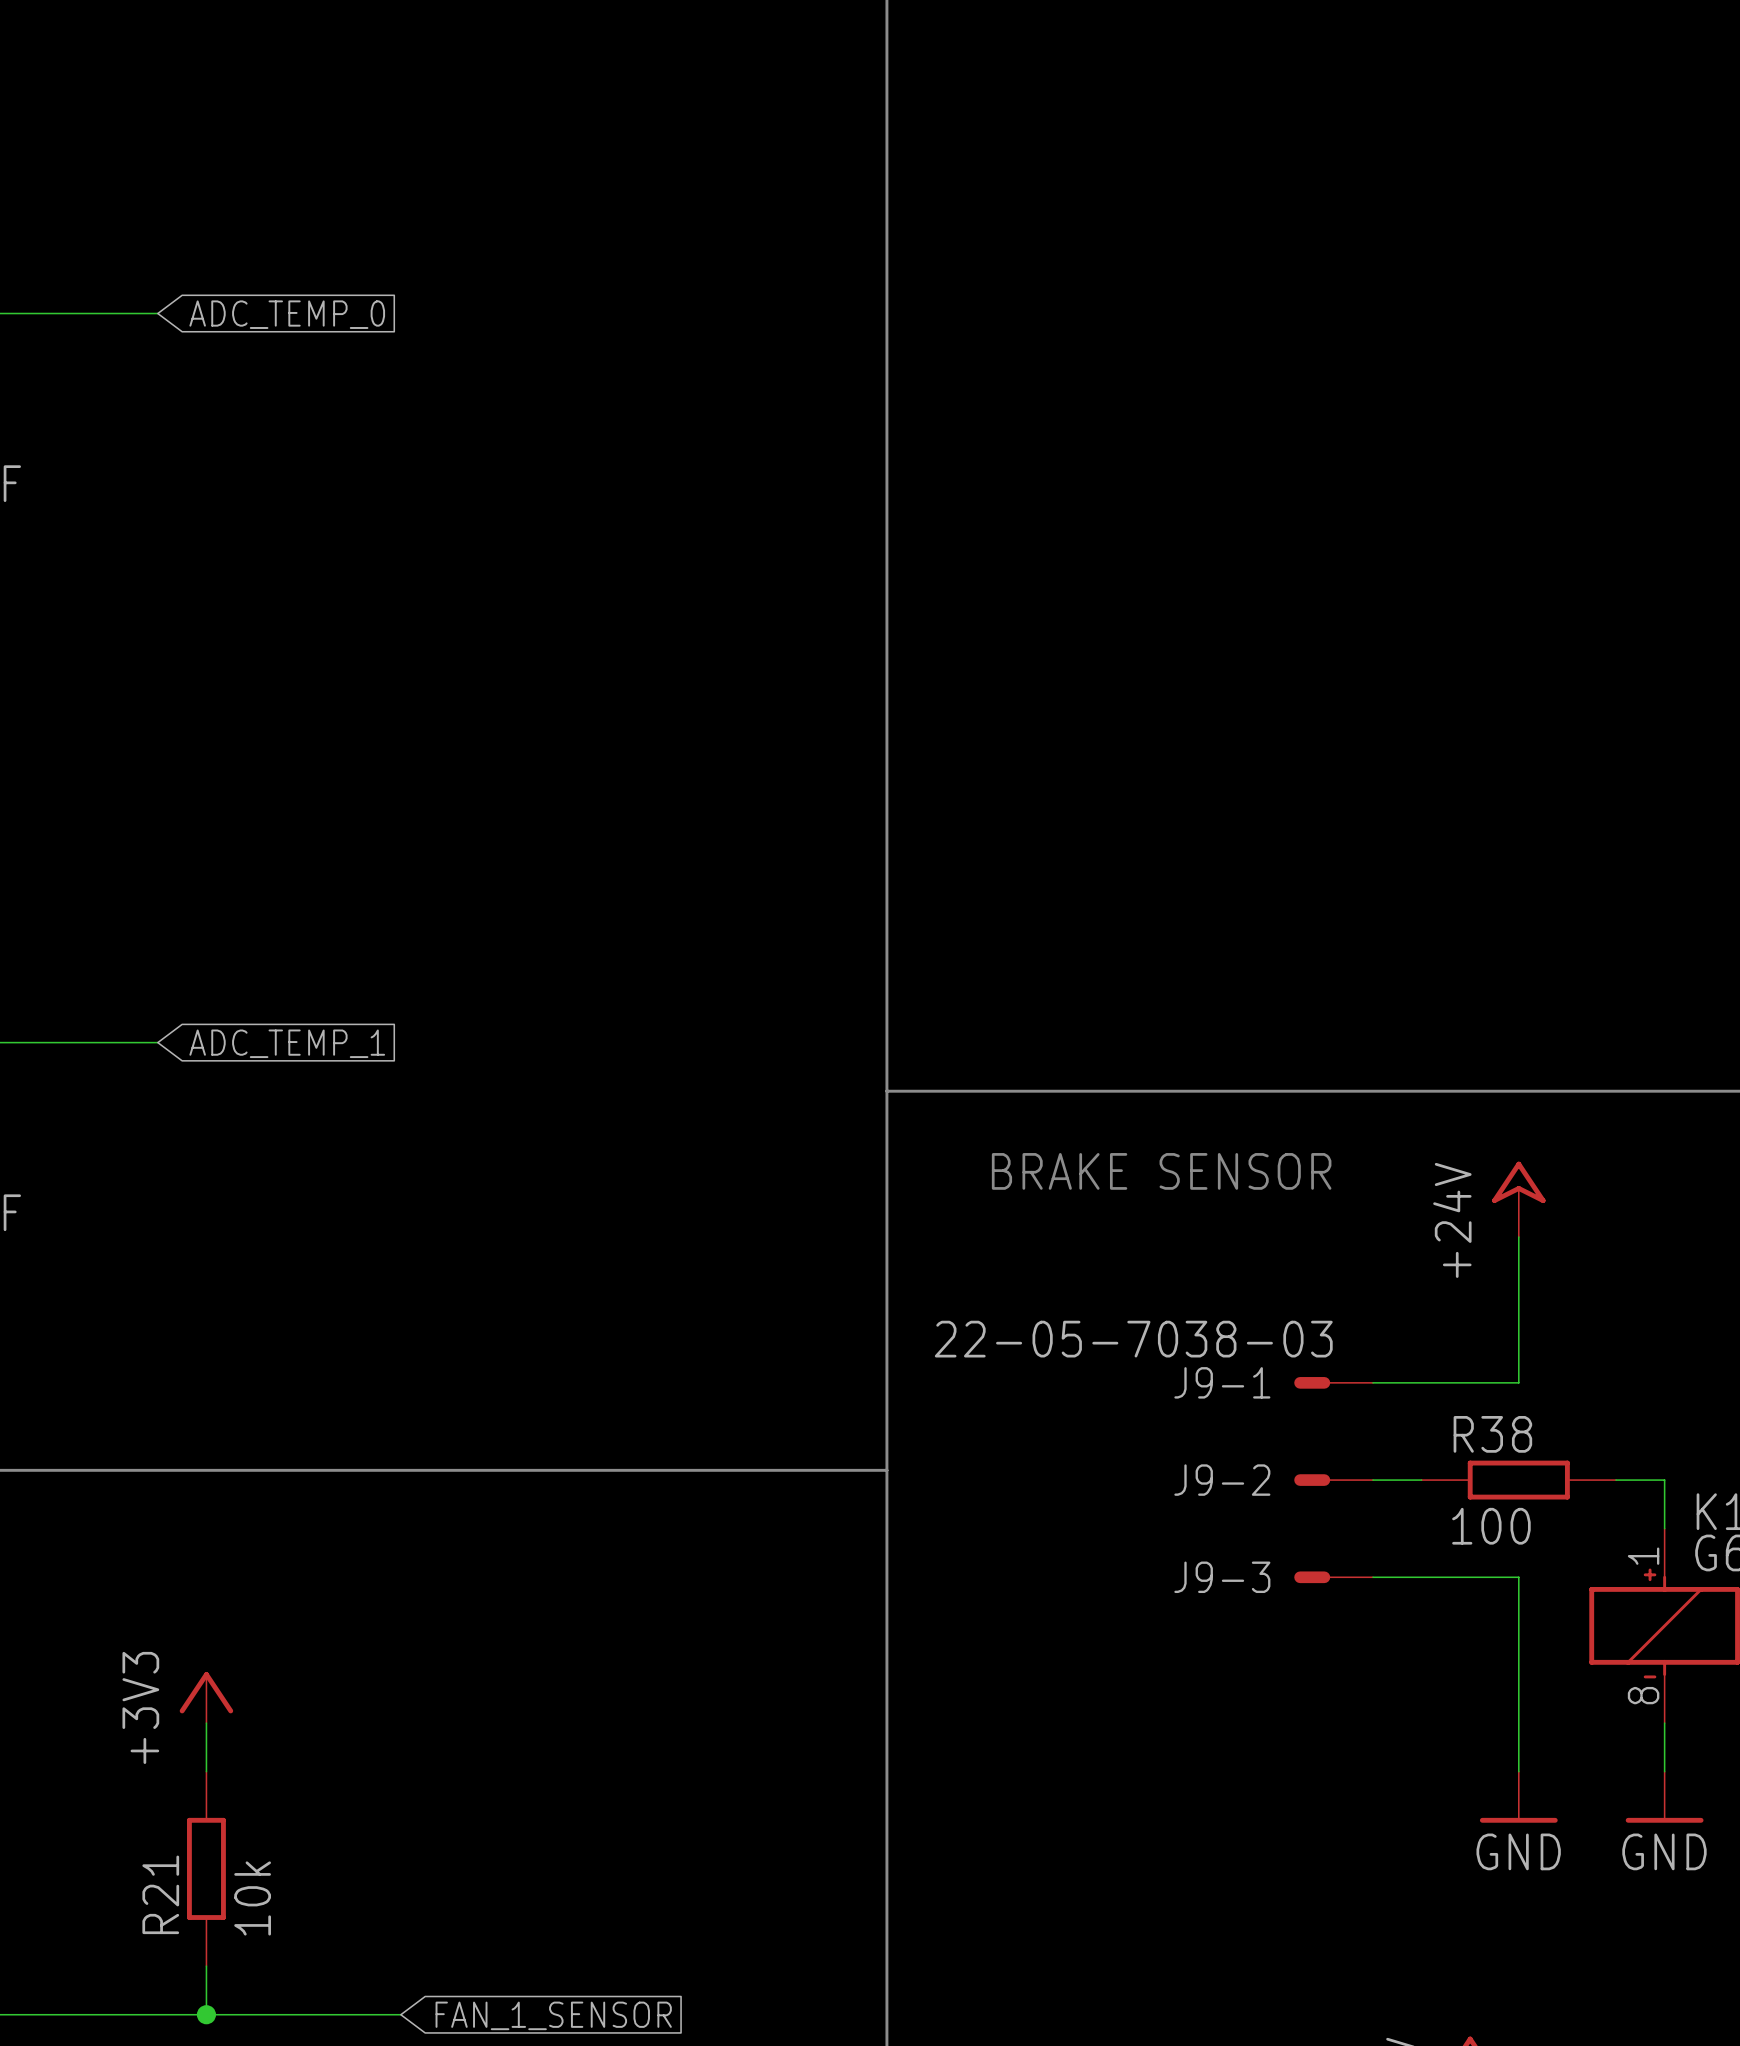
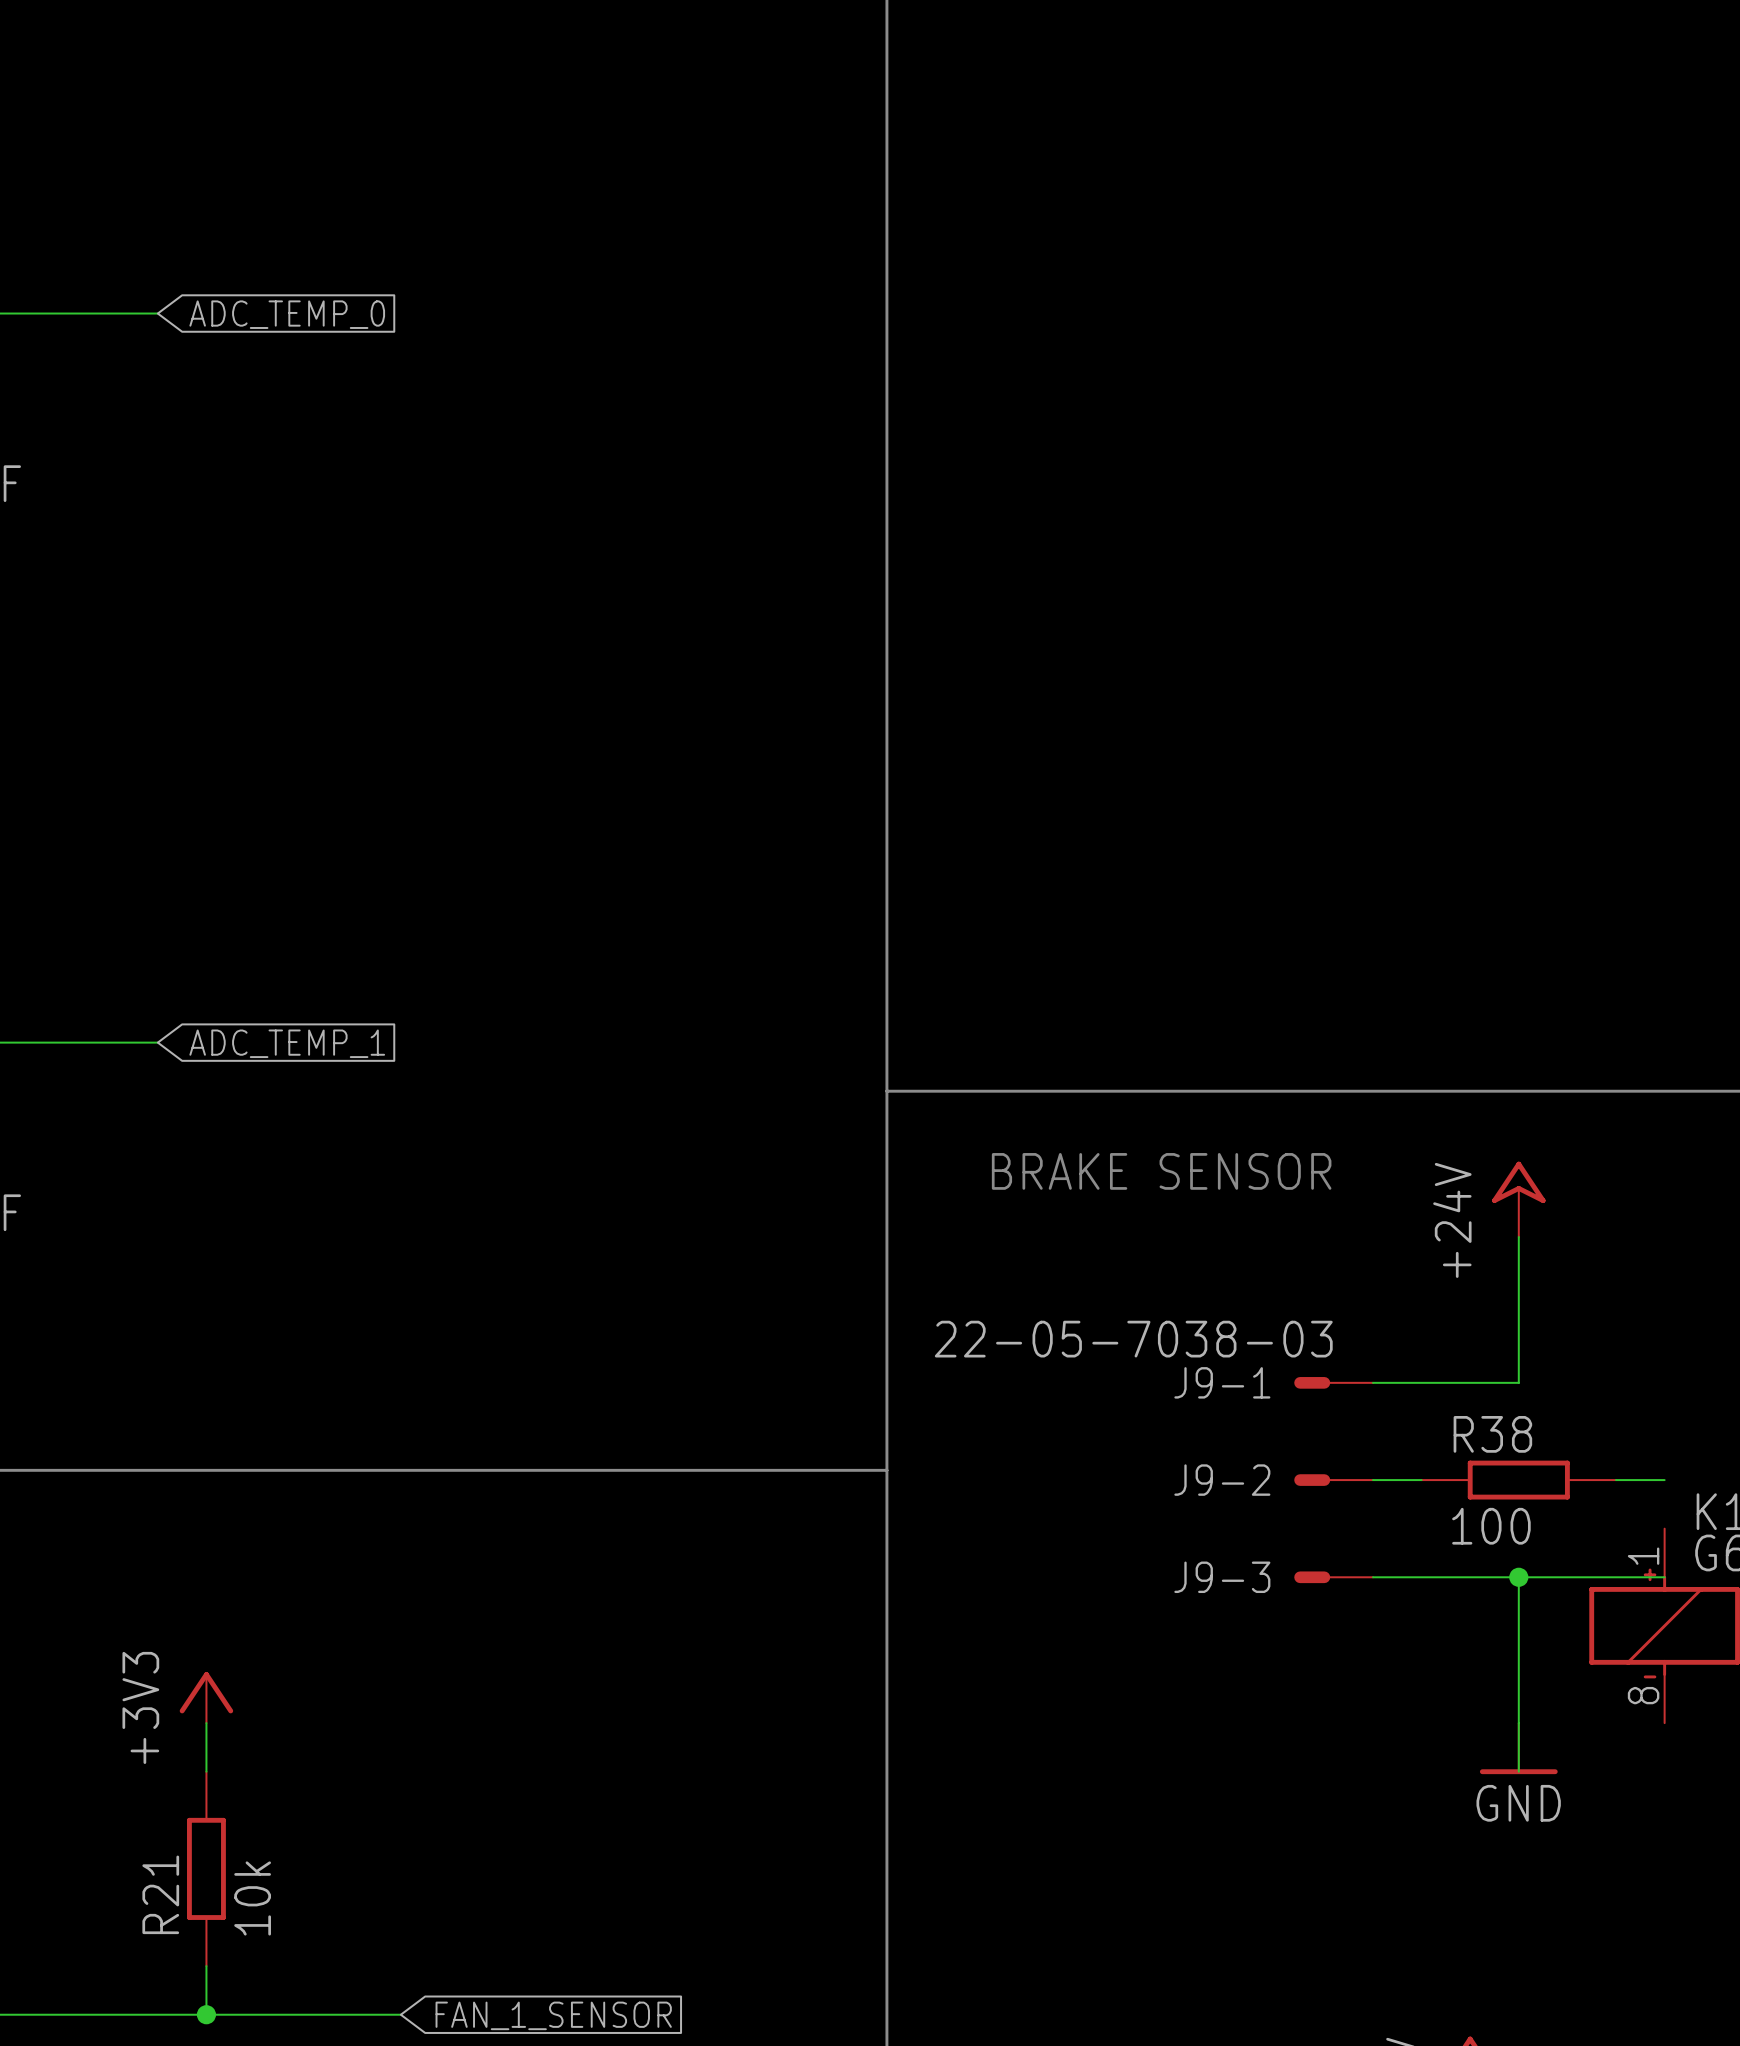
wire: (1664, 1480) (1664, 1528) -> none
wire: none -> (1518, 1577) (1664, 1577)
junction: none -> (1518, 1577)
wire: (1664, 1723) (1664, 1771) -> none
power symbol position: GND (1518, 1797) -> GND (1518, 1748)
power symbol: GND (1664, 1797) -> none

